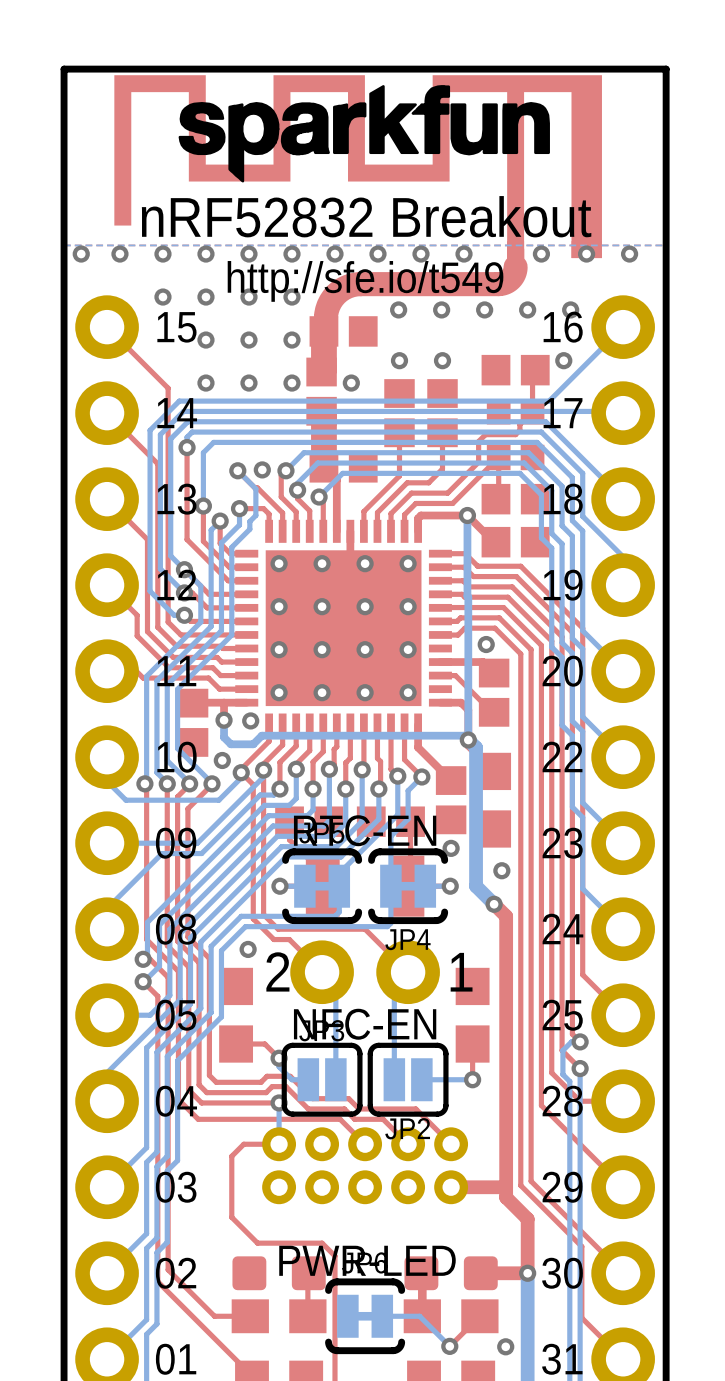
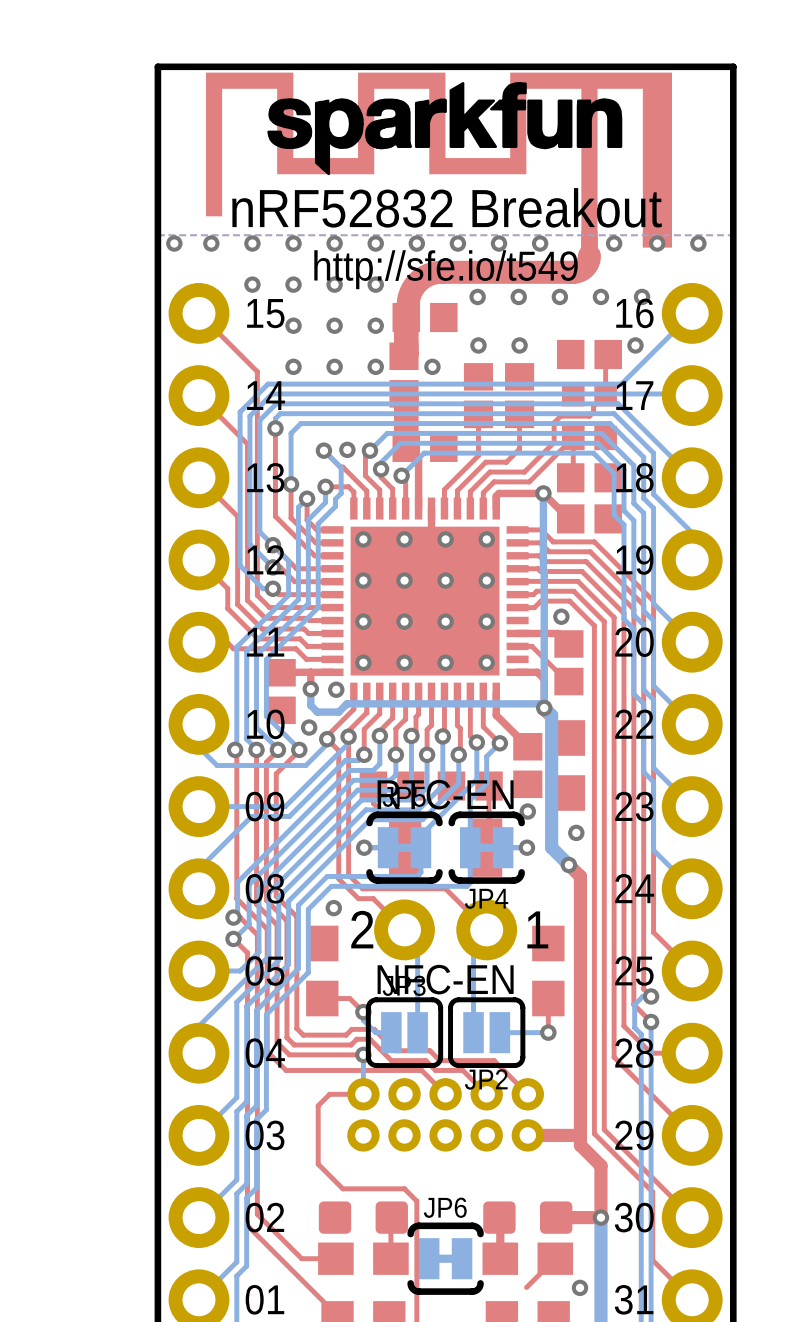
text: PWR-LED (367, 1260) -> none
bottom track: (382, 1316) (419, 1316) (449, 1346) -> none
via: (449, 1346) -> none

